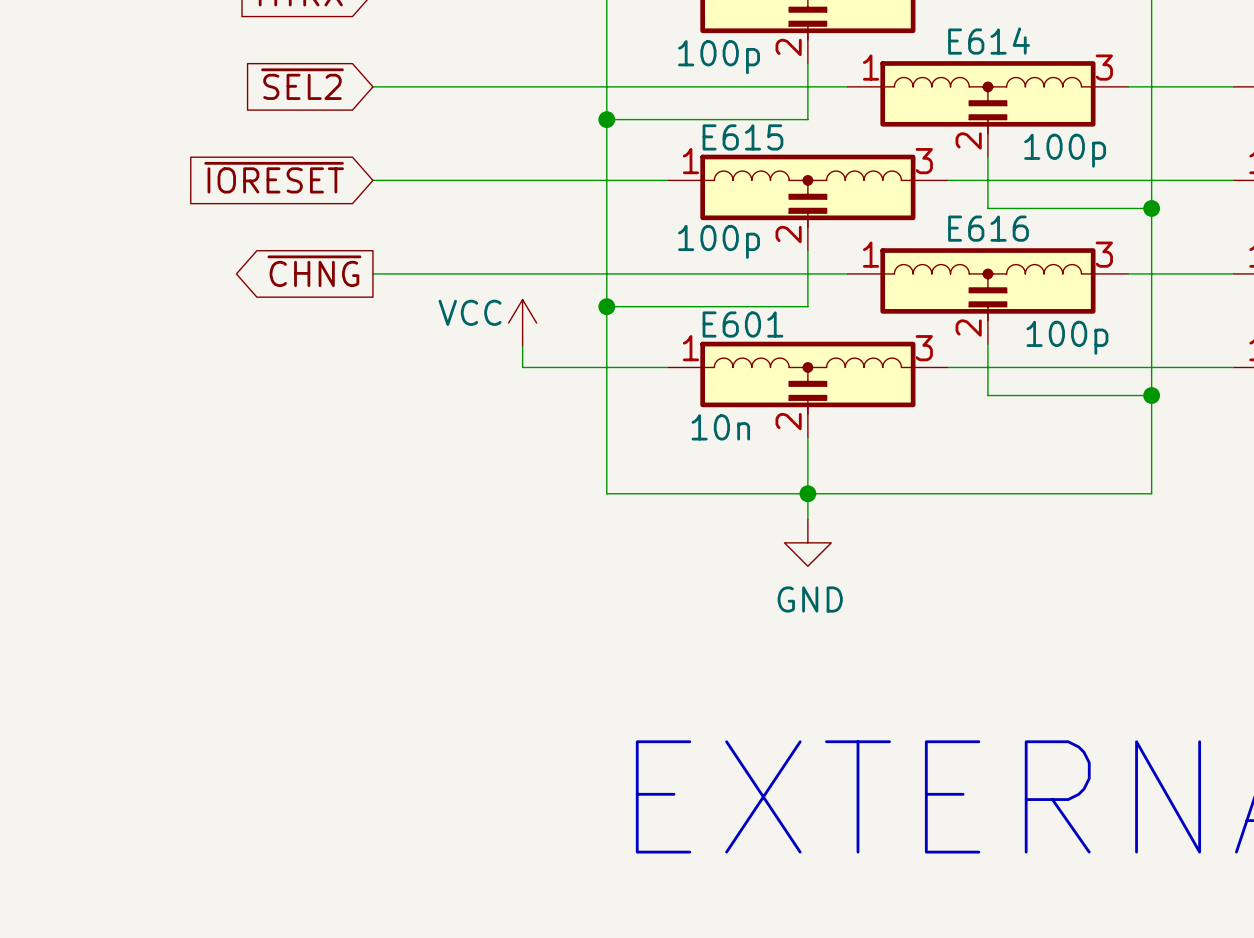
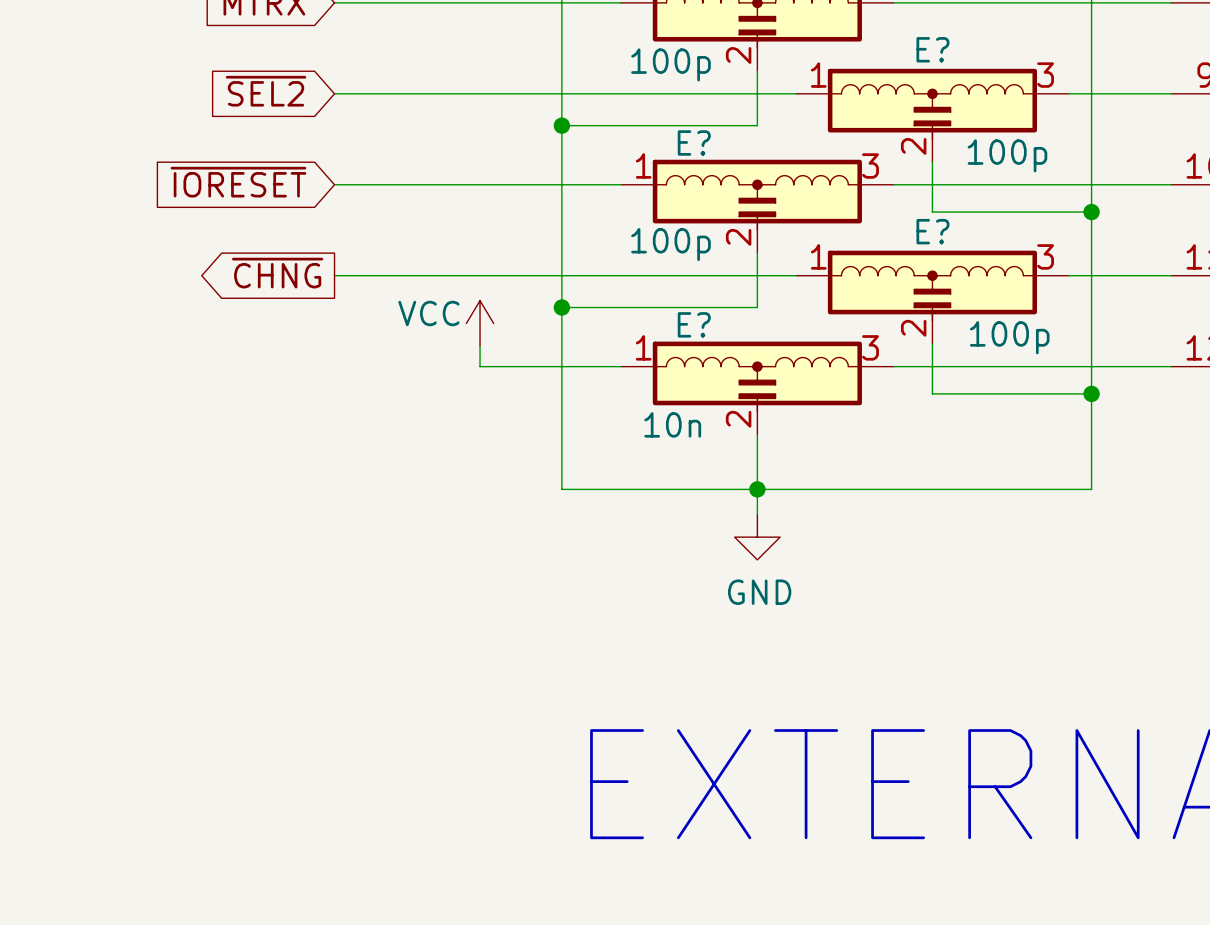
E614 name: E614 (989, 41) -> E? (932, 49)
E615 name: E615 (742, 137) -> E? (694, 142)
E616 name: E616 (988, 228) -> E? (932, 231)
E601 name: E601 (742, 324) -> E? (694, 324)

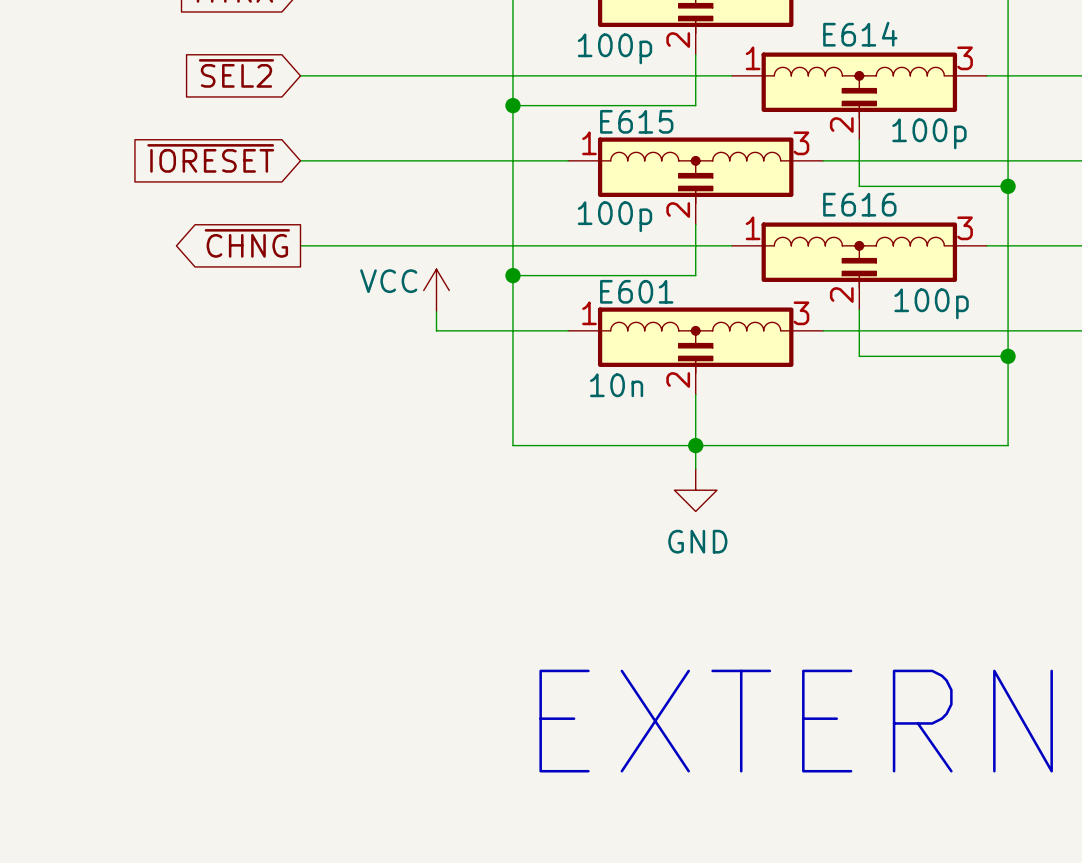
E? name: E? (932, 49) -> E614 (860, 34)
E? name: E? (694, 142) -> E615 (636, 121)
E? name: E? (932, 231) -> E616 (859, 204)
E? name: E? (694, 324) -> E601 (636, 291)

